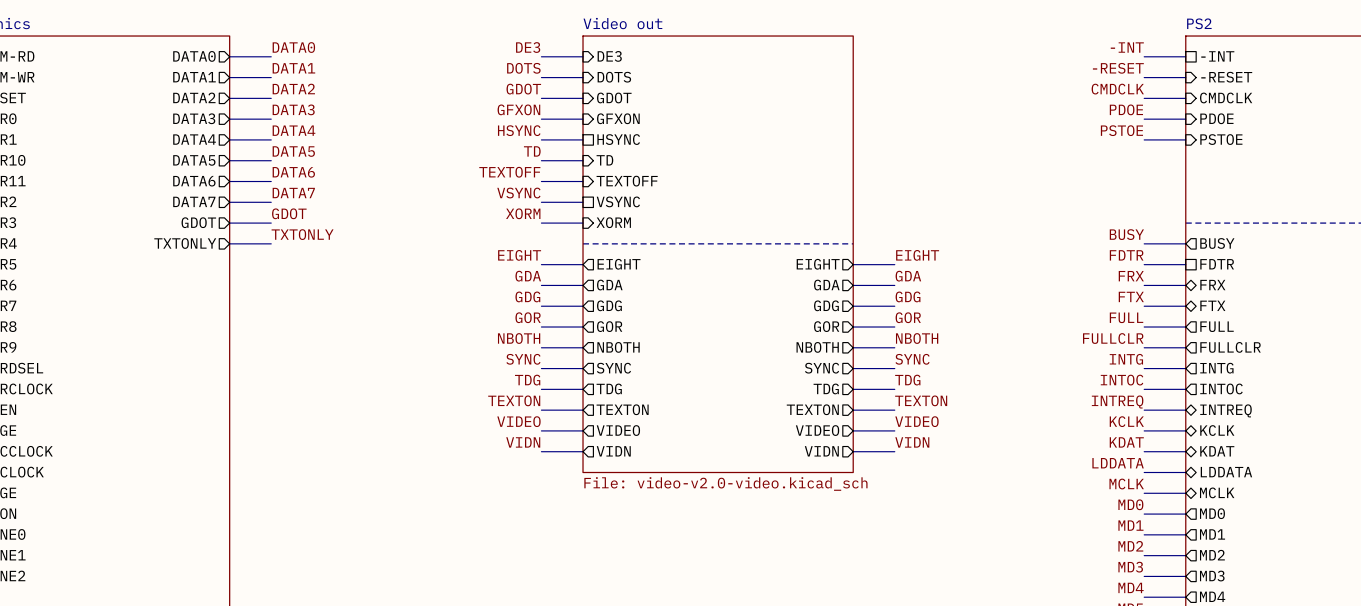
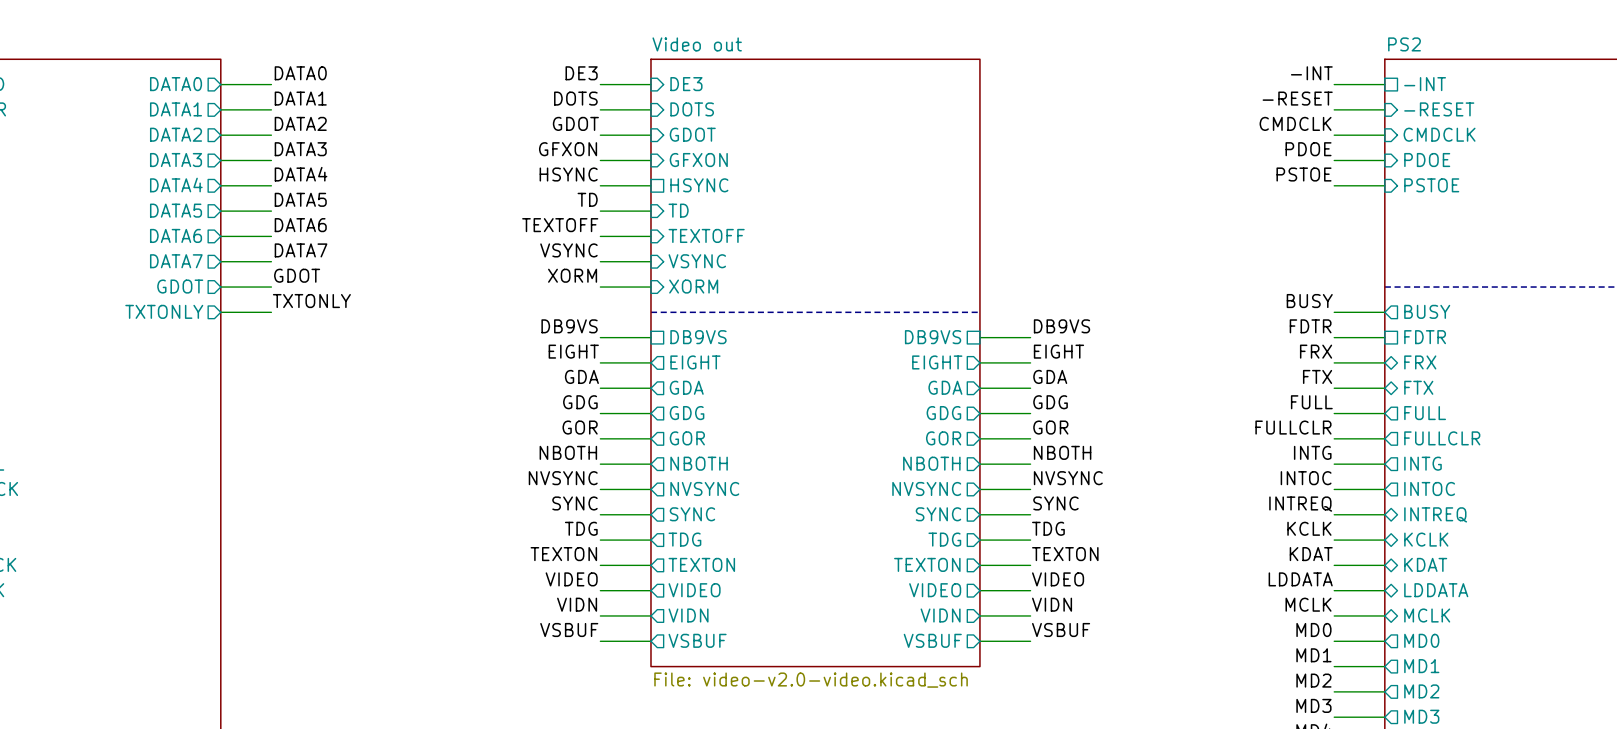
sheet pin shape: passive (618, 201) -> input (697, 261)
sheet Video out: File: video-v2.0-video.kicad_sch (718, 254) -> none
label: EIGHT (519, 255) -> DB9VS (569, 326)
label: EIGHT (917, 255) -> DB9VS (1061, 326)
sheet pin shape: output (619, 264) -> passive (698, 337)
sheet pin: EIGHT (619, 264) -> DB9VS (698, 337)
sheet pin shape: output (818, 264) -> passive (933, 337)
sheet pin: EIGHT (818, 264) -> DB9VS (933, 337)
label: GDA (528, 276) -> EIGHT (573, 351)
label: GDA (908, 276) -> EIGHT (1058, 351)
sheet pin: GDA (609, 285) -> EIGHT (695, 362)
sheet Video out: none -> File: video-v2.0-video.kicad_sch (815, 362)
sheet pin: GDA (826, 285) -> EIGHT (937, 362)
label: GDG (527, 296) -> GDA (581, 376)
label: GDG (908, 296) -> GDA (1050, 376)
sheet pin: GDG (609, 305) -> GDA (686, 387)
sheet pin: GDG (826, 305) -> GDA (945, 387)
label: GOR (528, 317) -> GDG (580, 402)
label: GOR (908, 317) -> GDG (1050, 402)
sheet pin: GOR (609, 326) -> GDG (687, 413)
sheet pin: GOR (826, 326) -> GDG (943, 413)
label: NBOTH (519, 338) -> GOR (580, 427)
label: NBOTH (917, 338) -> GOR (1050, 427)
sheet pin: NBOTH (618, 347) -> GOR (687, 438)
sheet pin: NBOTH (817, 347) -> GOR (943, 438)
label: SYNC (523, 359) -> NBOTH (568, 452)
label: SYNC (912, 359) -> NBOTH (1062, 452)
sheet pin: SYNC (613, 368) -> NBOTH (699, 463)
sheet pin: SYNC (822, 368) -> NBOTH (931, 463)
label: TDG (527, 380) -> NVSYNC (563, 478)
label: TDG (907, 380) -> NVSYNC (1068, 478)
sheet pin: TDG (609, 388) -> NVSYNC (704, 488)
sheet pin: TDG (826, 388) -> NVSYNC (926, 488)
label: TEXTON (514, 400) -> SYNC (574, 503)
label: TEXTON (921, 400) -> SYNC (1055, 503)
sheet pin: TEXTON (622, 409) -> SYNC (692, 514)
sheet pin: TEXTON (812, 409) -> SYNC (938, 514)
label: VIDEO (518, 421) -> TDG (581, 528)
label: VIDEO (916, 421) -> TDG (1048, 528)
sheet pin: VIDEO (618, 430) -> TDG (684, 539)
sheet pin: VIDEO (817, 430) -> TDG (944, 539)
label: VIDN (523, 442) -> TEXTON (563, 554)
label: VIDN (912, 442) -> TEXTON (1065, 554)
sheet pin: VIDN (613, 451) -> TEXTON (701, 564)
sheet pin: VIDN (821, 451) -> TEXTON (927, 564)
label: none -> VIDEO (571, 579)
label: none -> VIDEO (1058, 579)
wire: none -> (600, 590) (650, 590)
sheet pin: none -> VIDEO (694, 590)
sheet pin: none -> VIDEO (935, 590)
wire: none -> (979, 590) (1030, 590)
label: none -> VIDN (577, 604)
label: none -> VIDN (1052, 604)
sheet pin: none -> VIDN (688, 615)
sheet pin: none -> VIDN (940, 615)
wire: none -> (600, 615) (650, 615)
wire: none -> (979, 615) (1030, 615)
label: none -> VSBUF (569, 629)
label: none -> VSBUF (1061, 629)
sheet pin: none -> VSBUF (697, 640)
sheet pin: none -> VSBUF (932, 640)
wire: none -> (600, 641) (650, 641)
wire: none -> (979, 641) (1030, 641)

